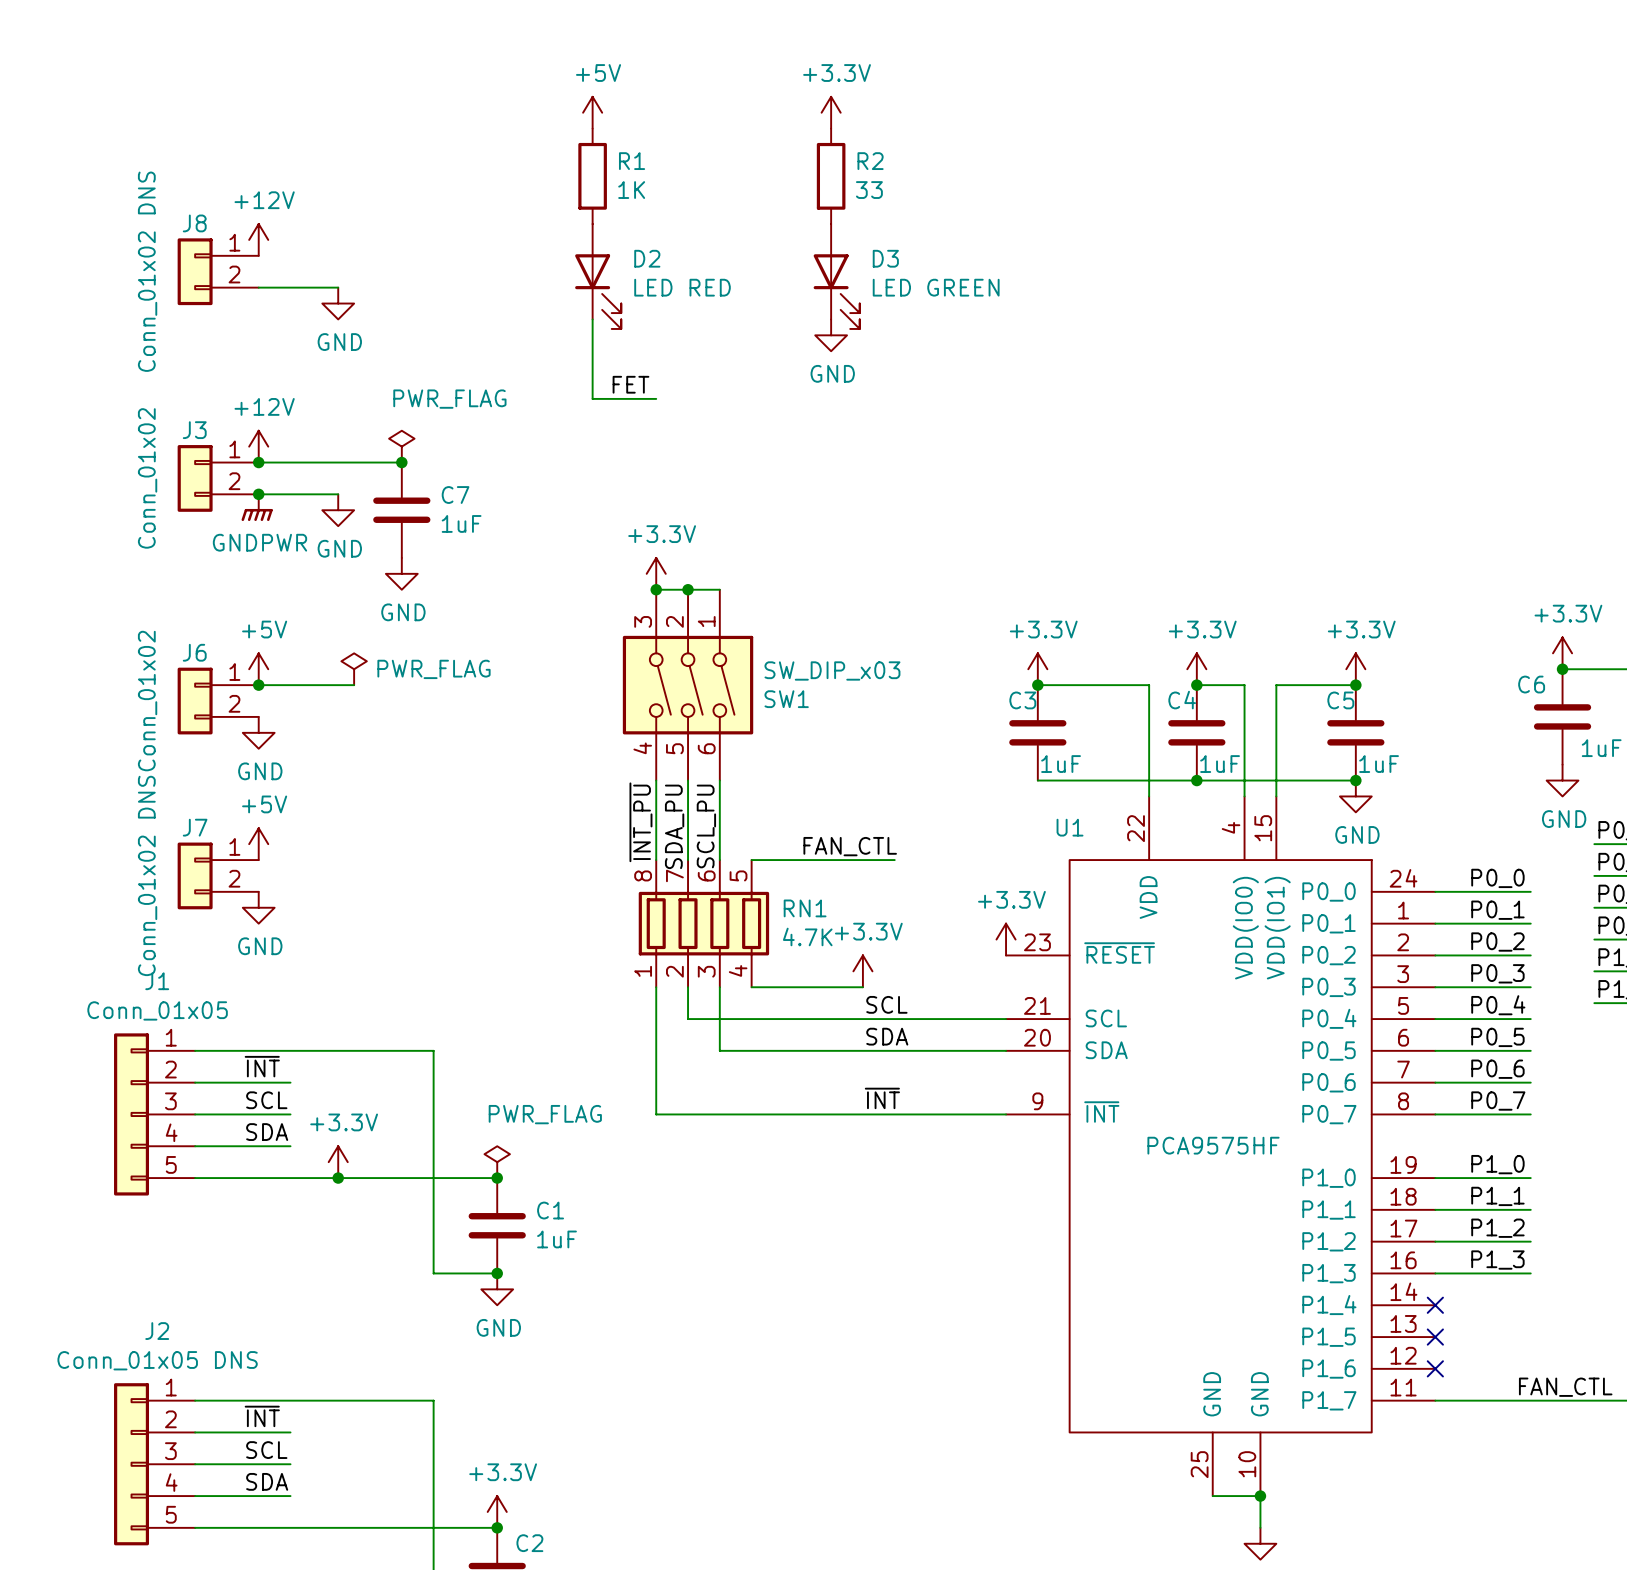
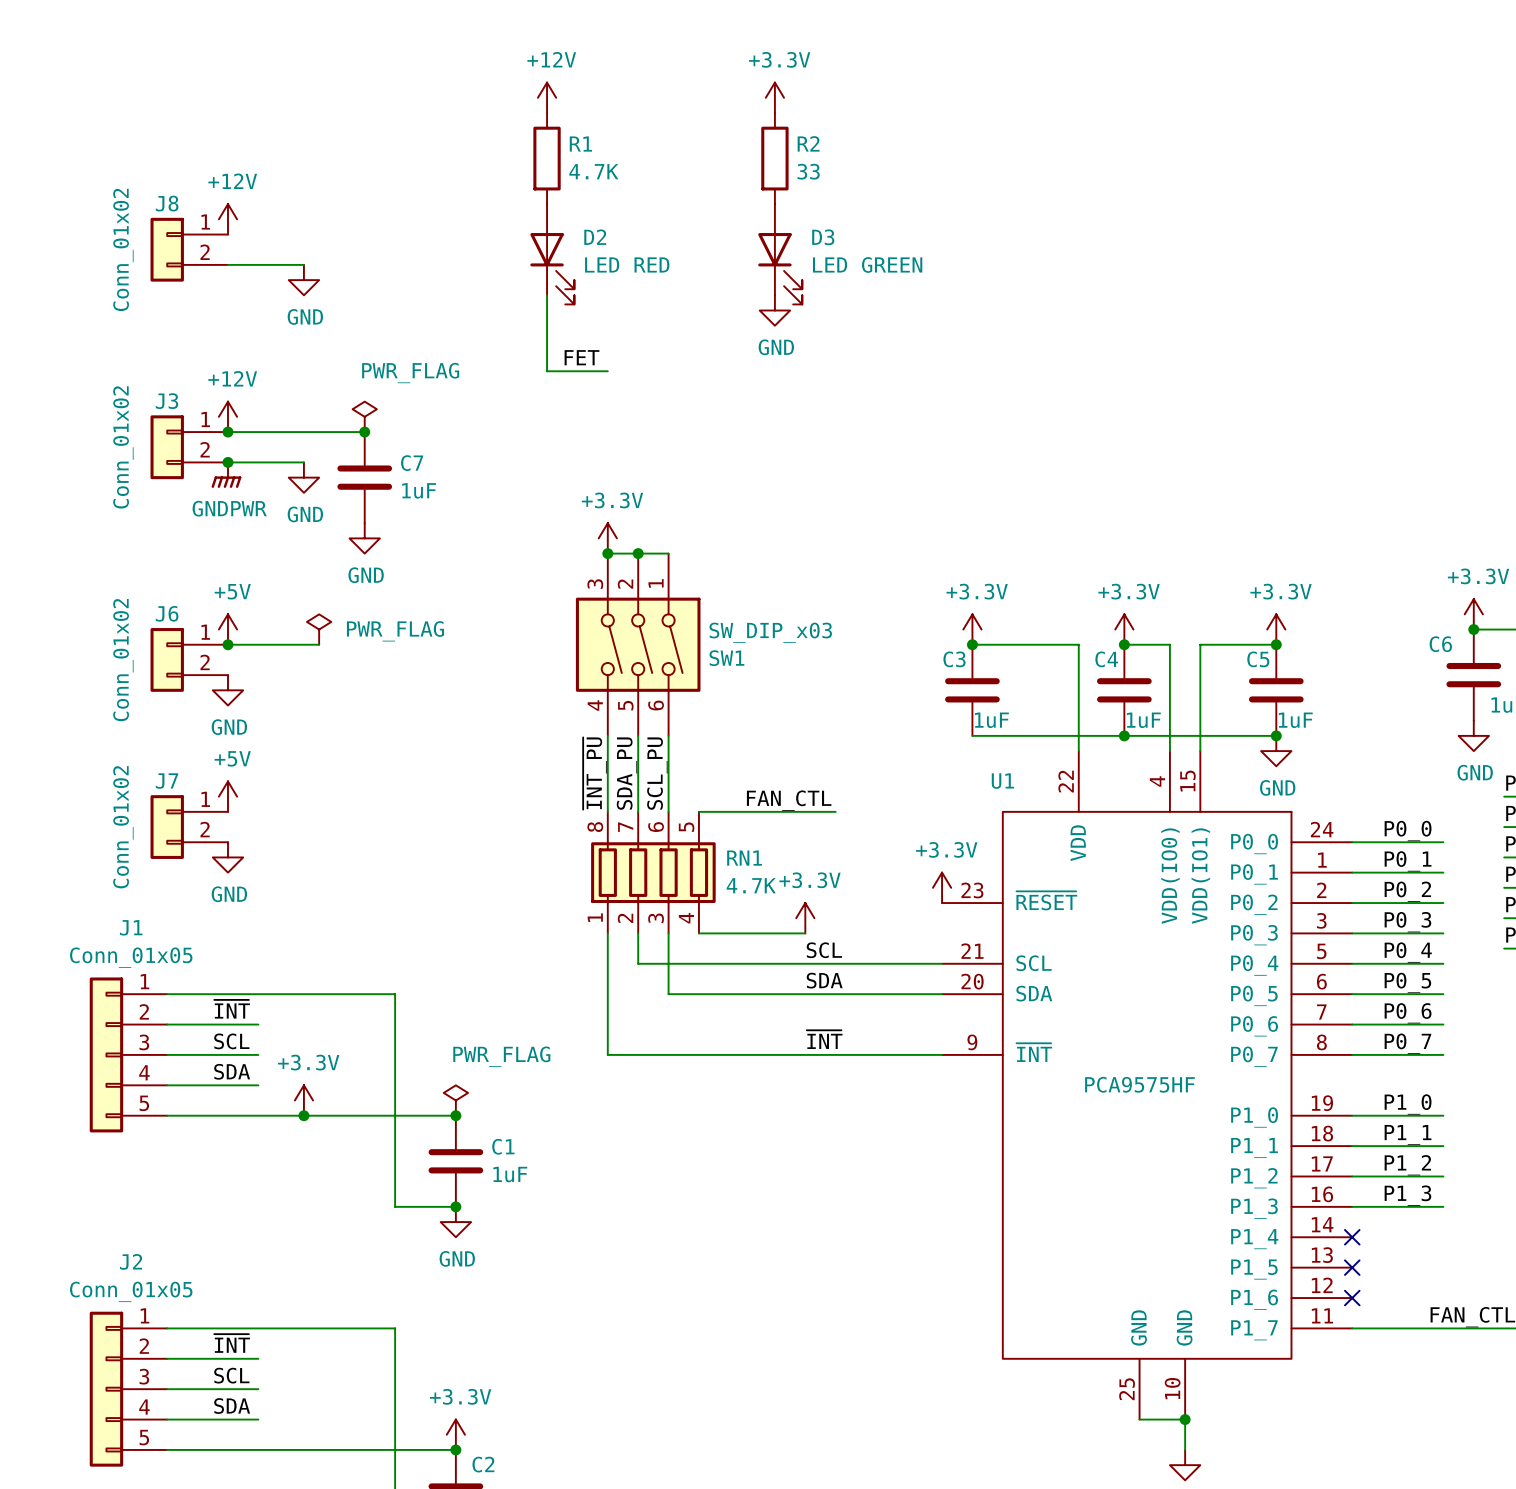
power symbol: +5V (592, 112) -> +12V (547, 97)
R1 value: 1K (631, 190) -> 4.7K (593, 171)
J8 value: Conn_01x02 DNS (147, 271) -> Conn_01x02 (123, 249)
J7 value: Conn_01x02 DNS (147, 875) -> Conn_01x02 (123, 827)
J2 value: Conn_01x05 DNS (157, 1360) -> Conn_01x05 (131, 1291)

